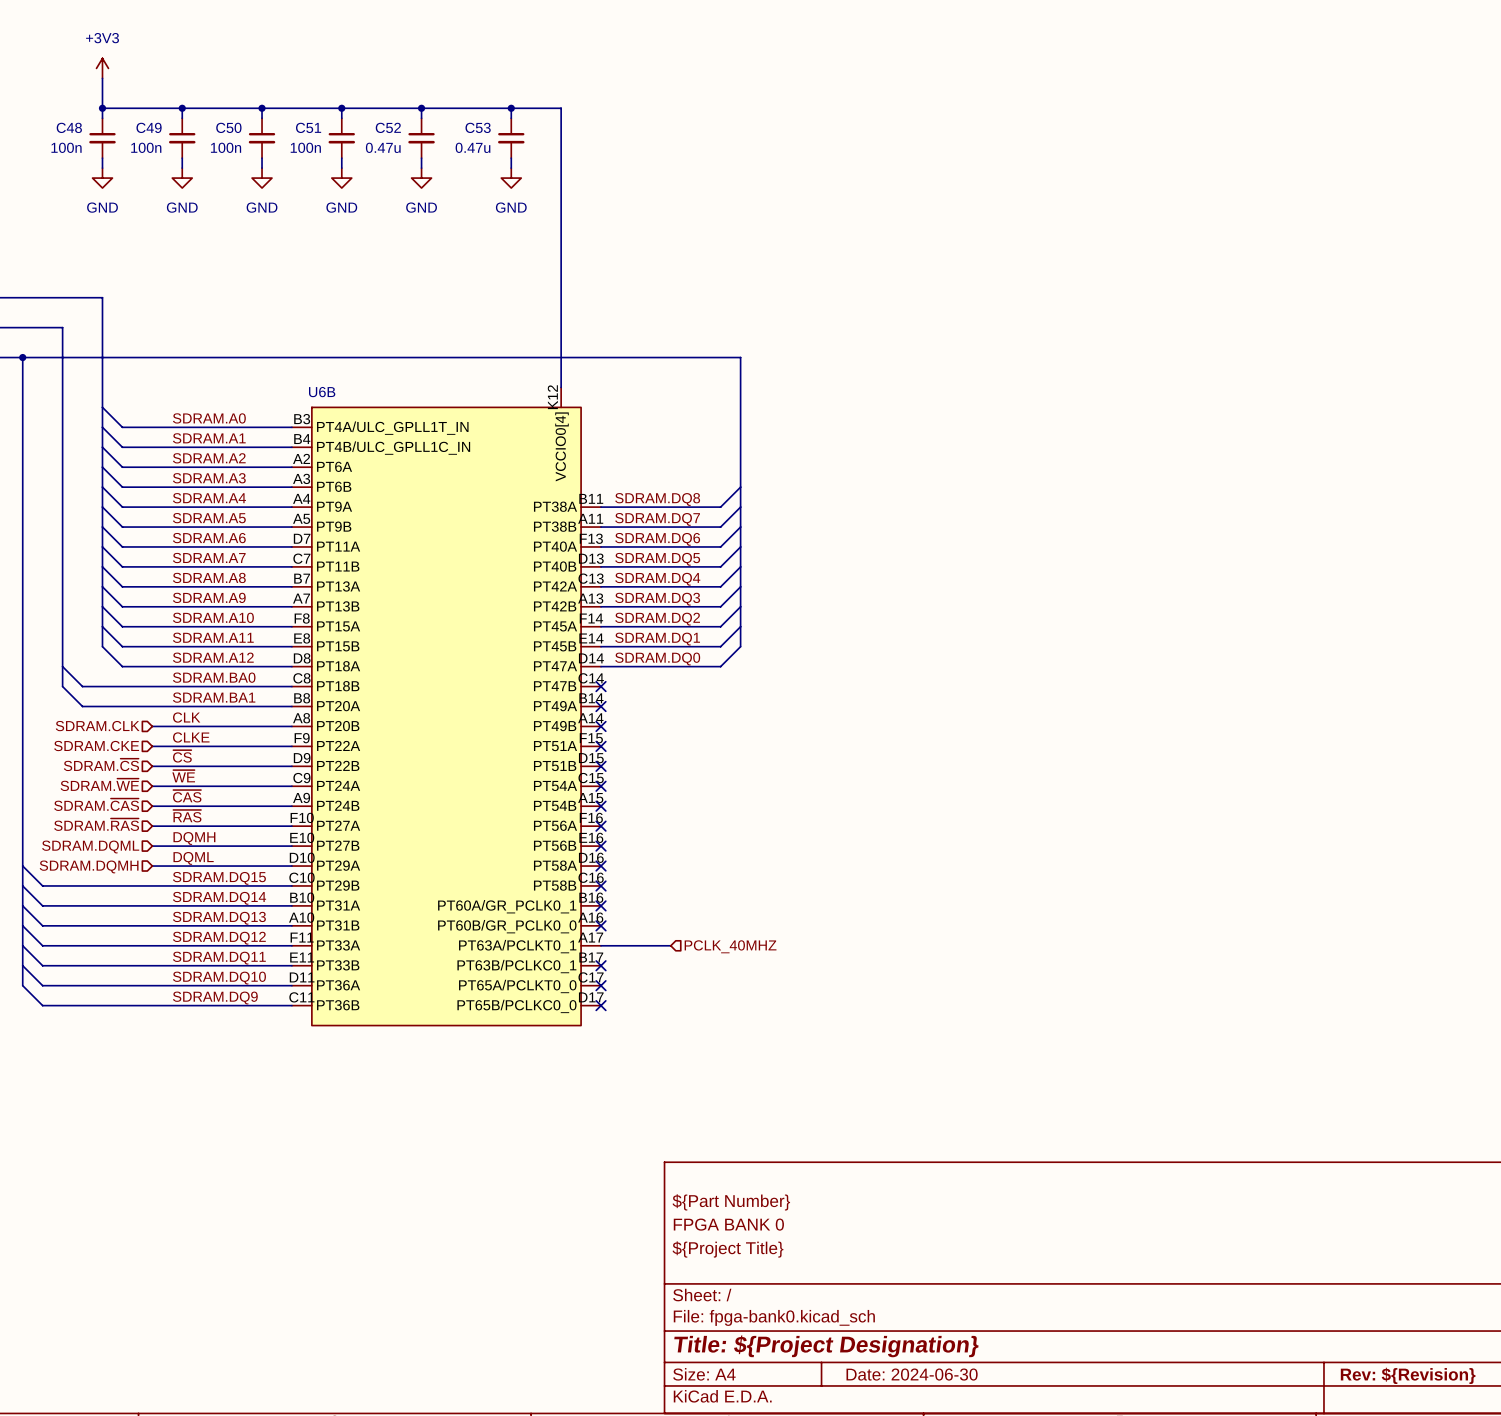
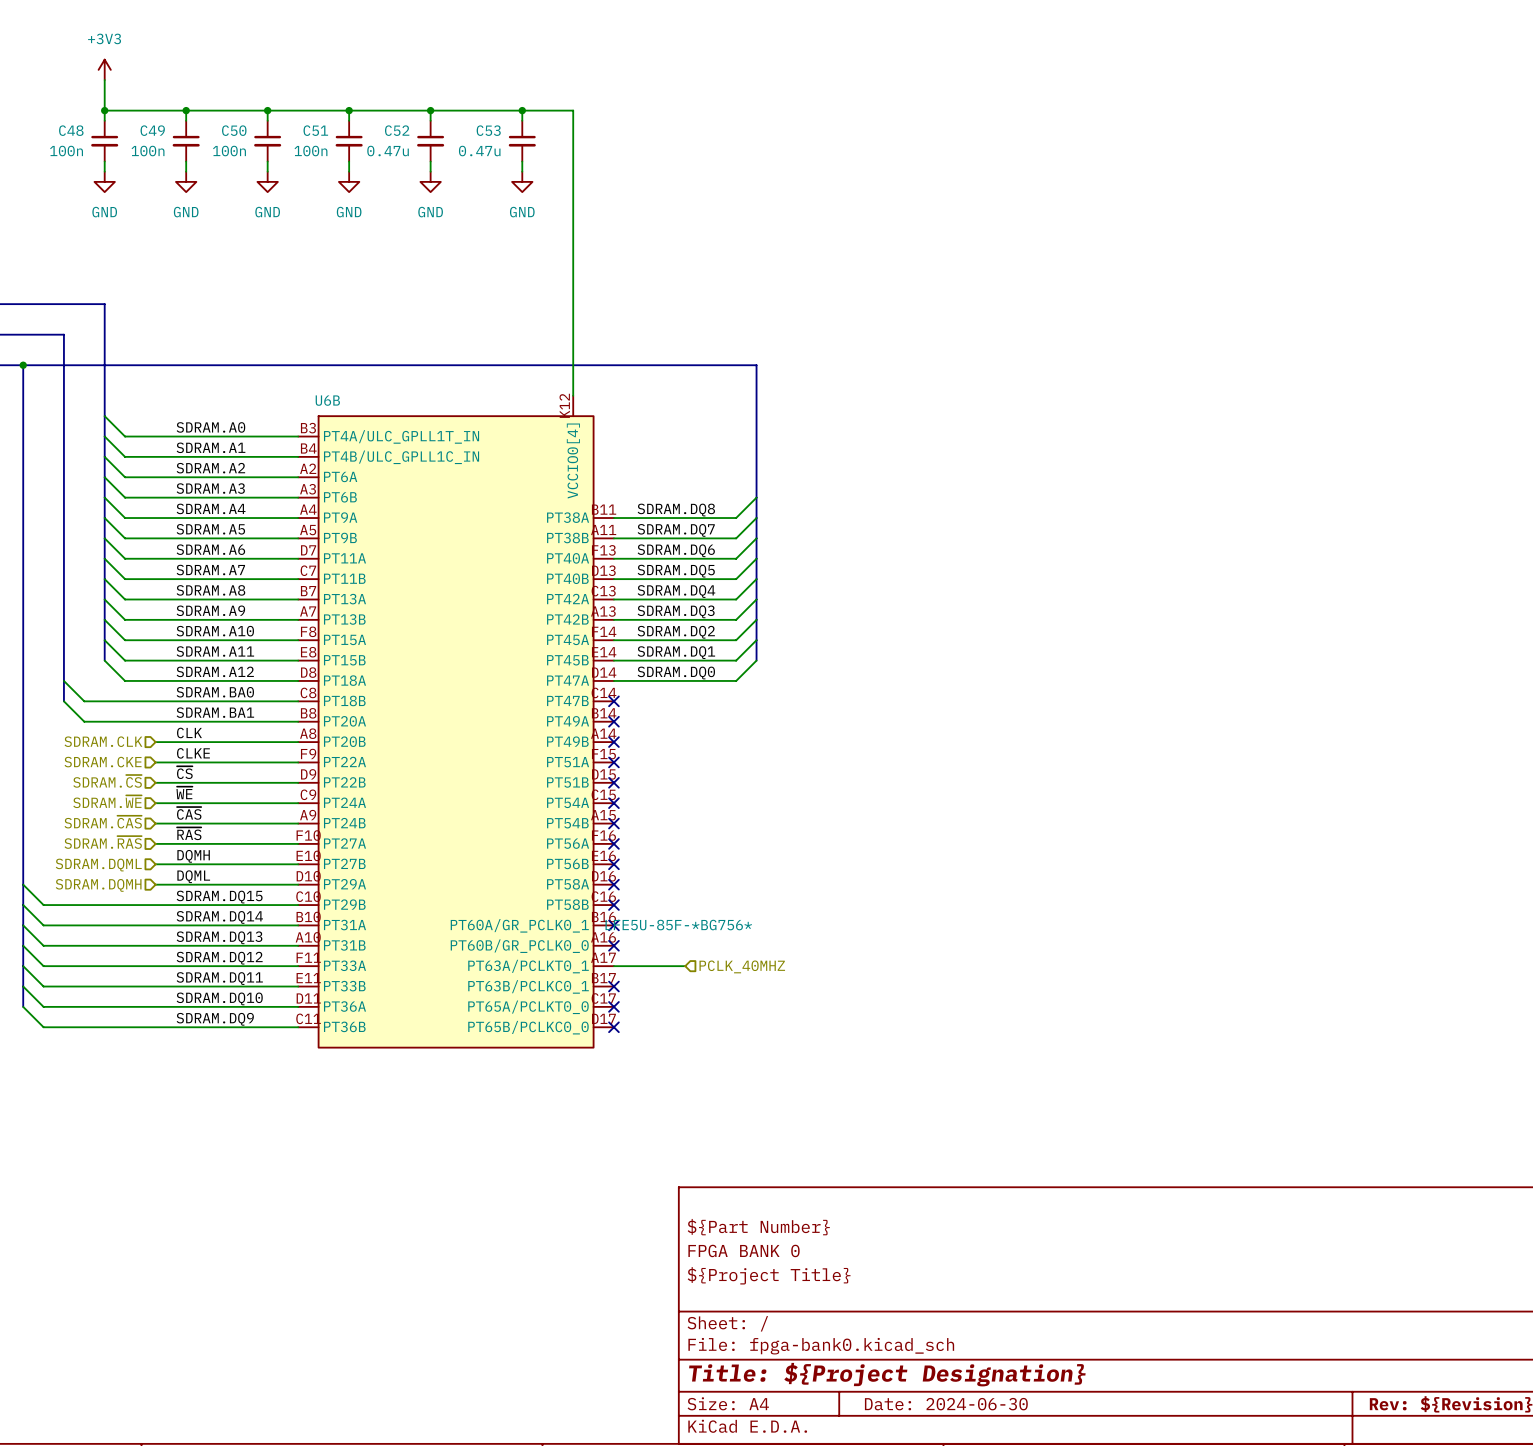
U6B value: none -> LFE5U-85F-*BG756* (678, 925)

